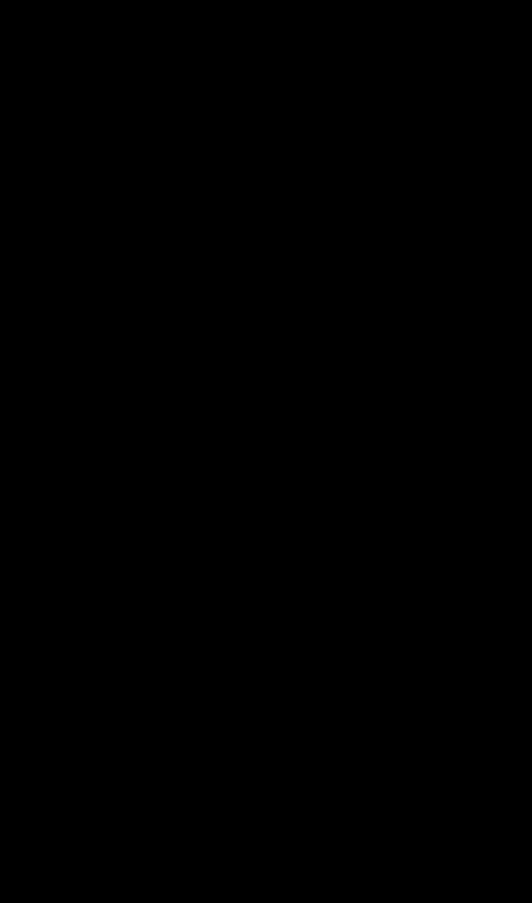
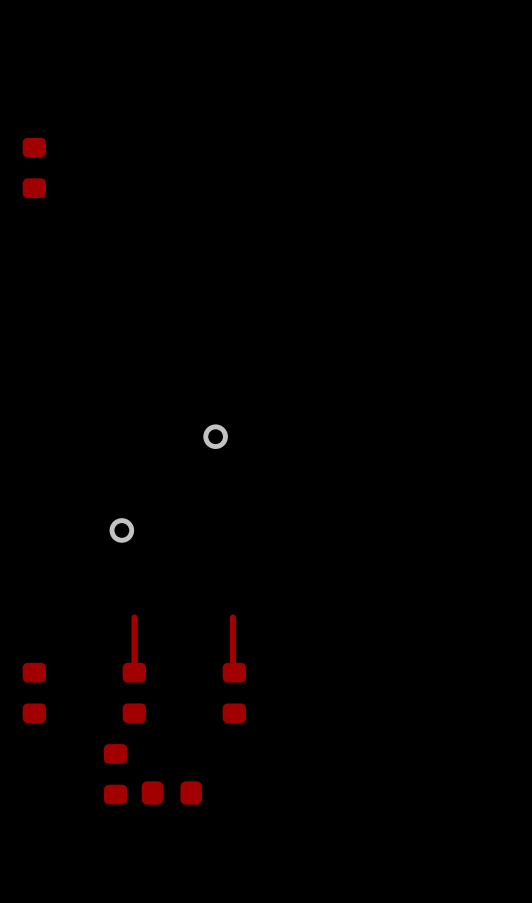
part: none -> (34, 167)
via: none -> (215, 436)
via: none -> (121, 530)
top track: none -> (134, 617) (134, 672)
top track: none -> (232, 617) (234, 672)
part: none -> (34, 692)
part: none -> (134, 692)
part: none -> (234, 692)
part: none -> (115, 774)
part: none -> (171, 792)

